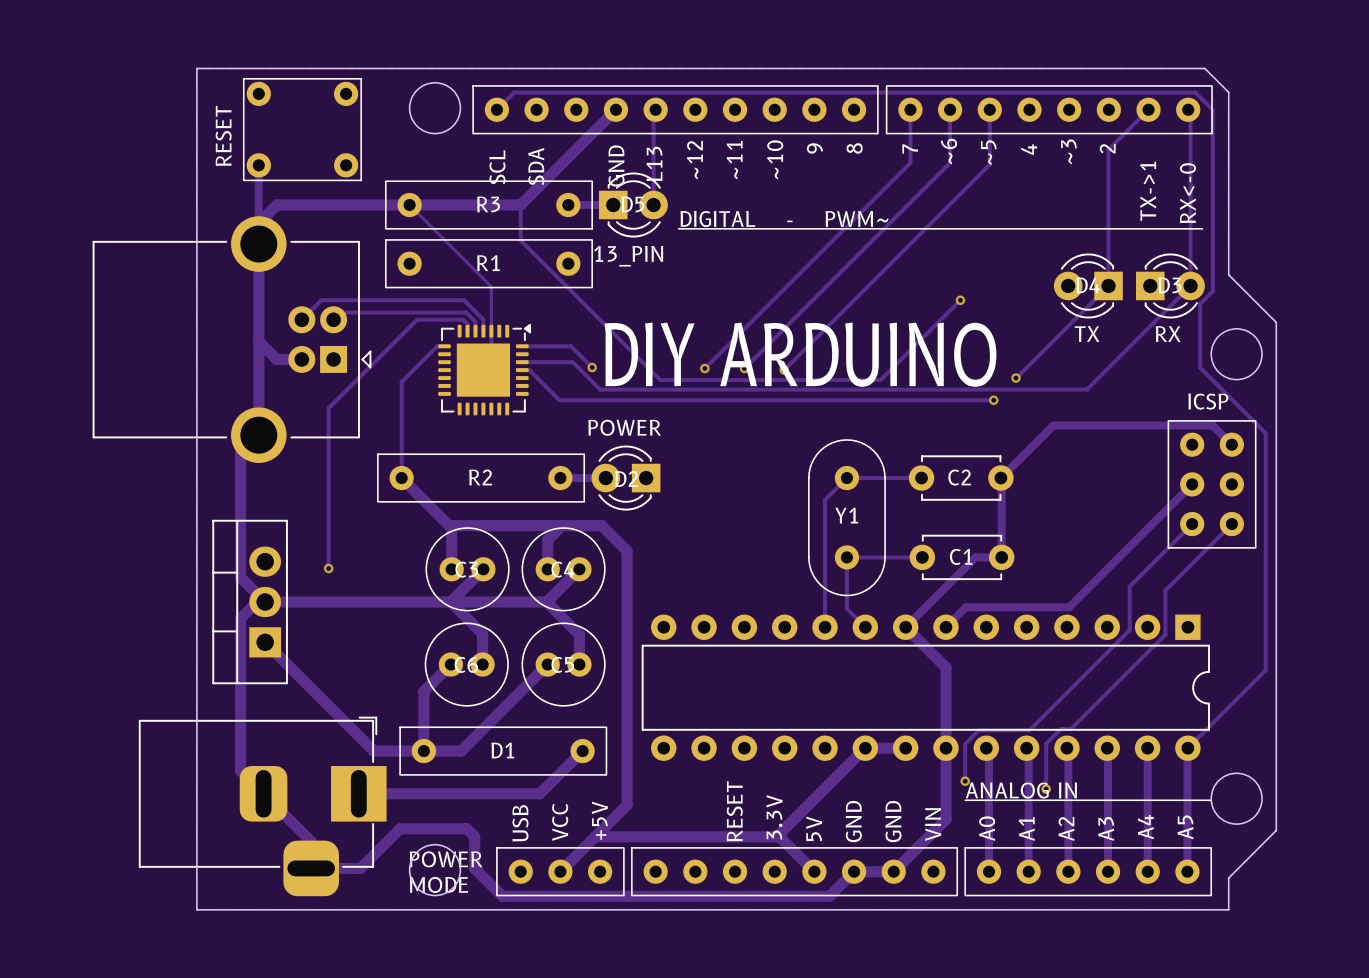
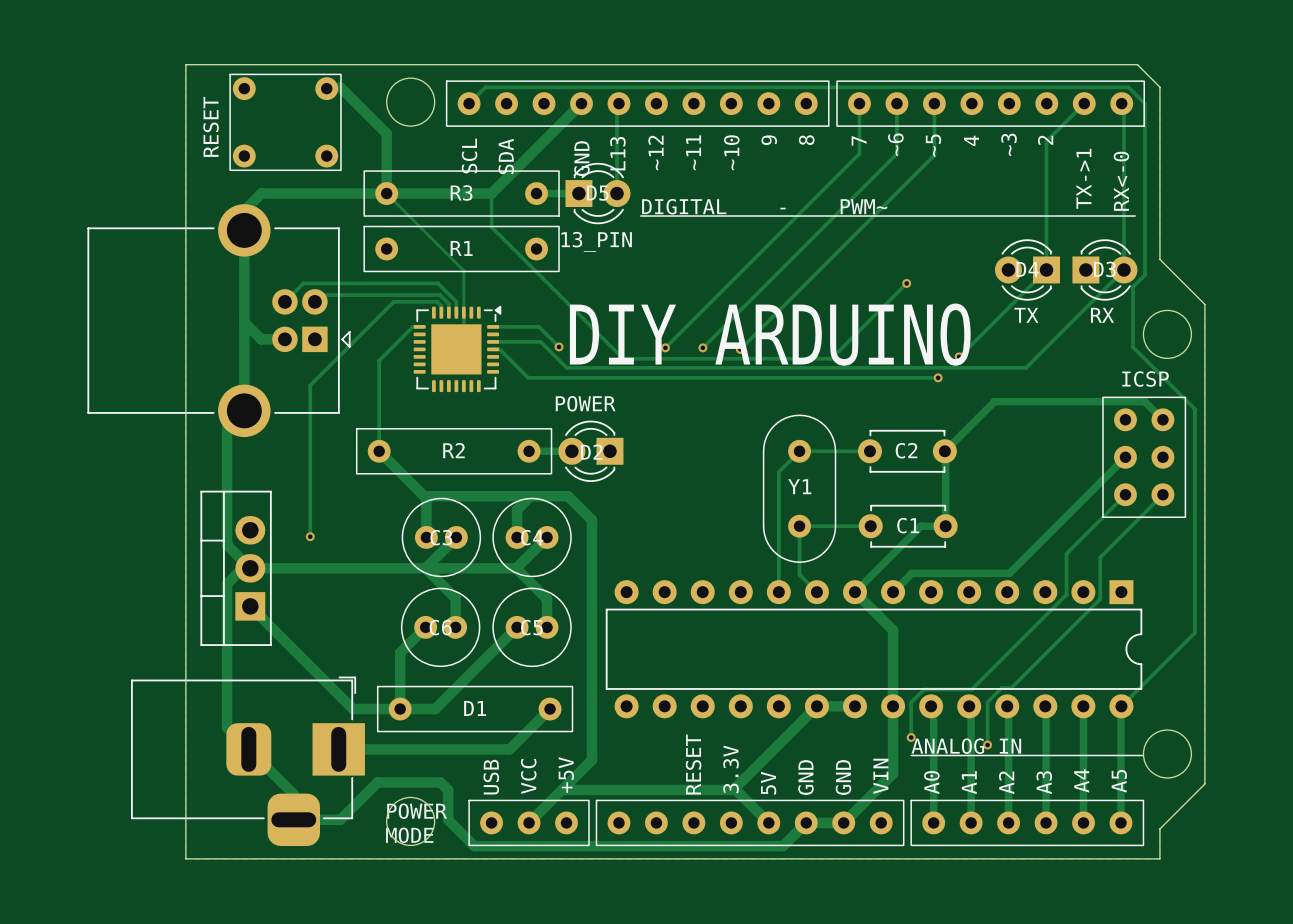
track: none -> (340, 87) (386, 133) (386, 193)
track: (258, 165) (258, 244) -> none

